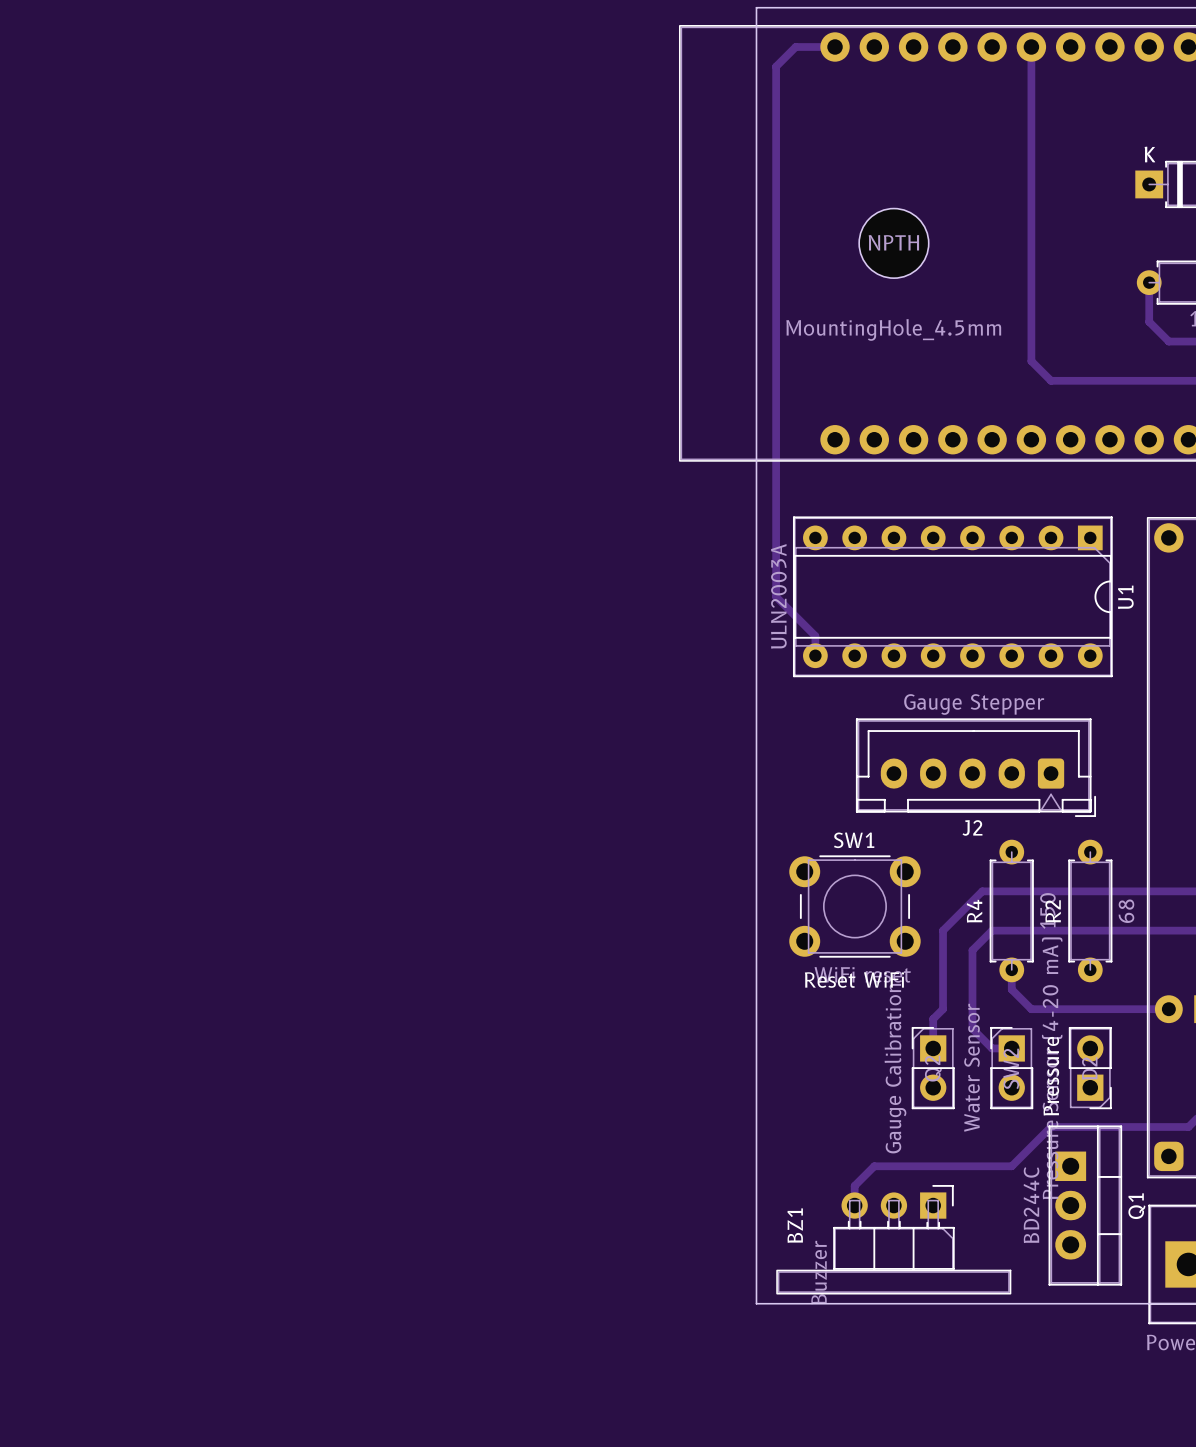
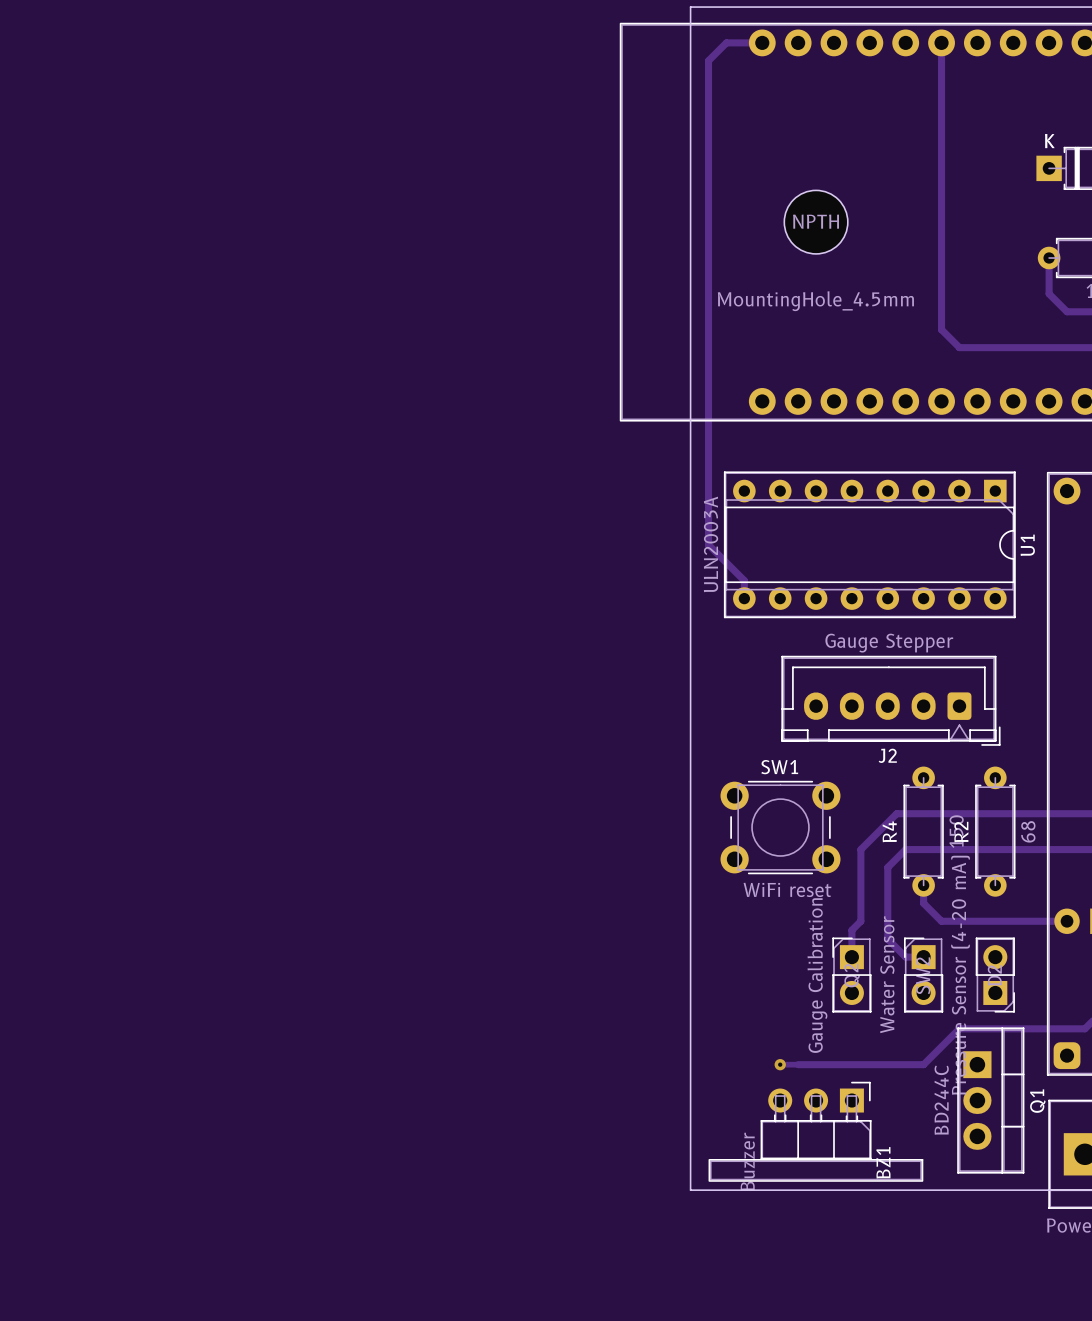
text: Reset WiFi (854, 980) -> none
text: Pressure (1051, 1076) -> none
via: none -> (780, 1064)
track: (874, 1166) (854, 1185) (854, 1205) -> (798, 1064) (780, 1064)
BZ1 name position: BZ1 (795, 1225) -> BZ1 (883, 1162)

